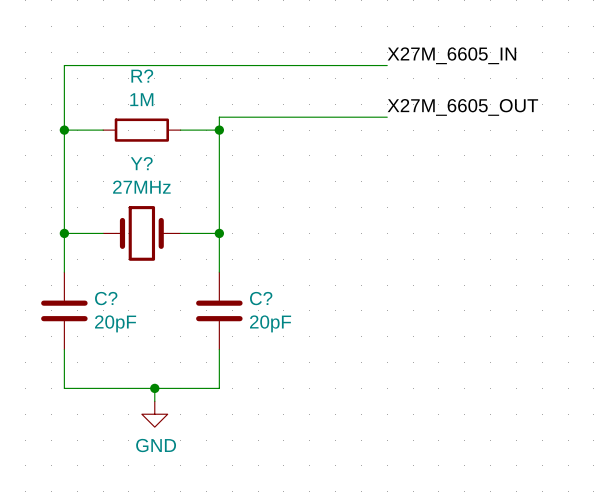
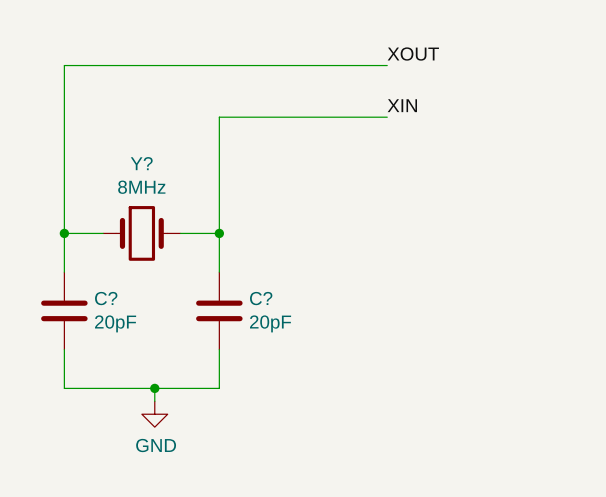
label: X27M_6605_IN (451, 55) -> XOUT (413, 54)
label: X27M_6605_OUT (462, 107) -> XIN (402, 105)
wire: (64, 130) (103, 130) -> none
junction: (64, 130) -> none
R?: 1M (141, 130) -> none
wire: (180, 130) (219, 130) -> none
junction: (219, 130) -> none
Y? value: 27MHz (141, 187) -> 8MHz (141, 187)

